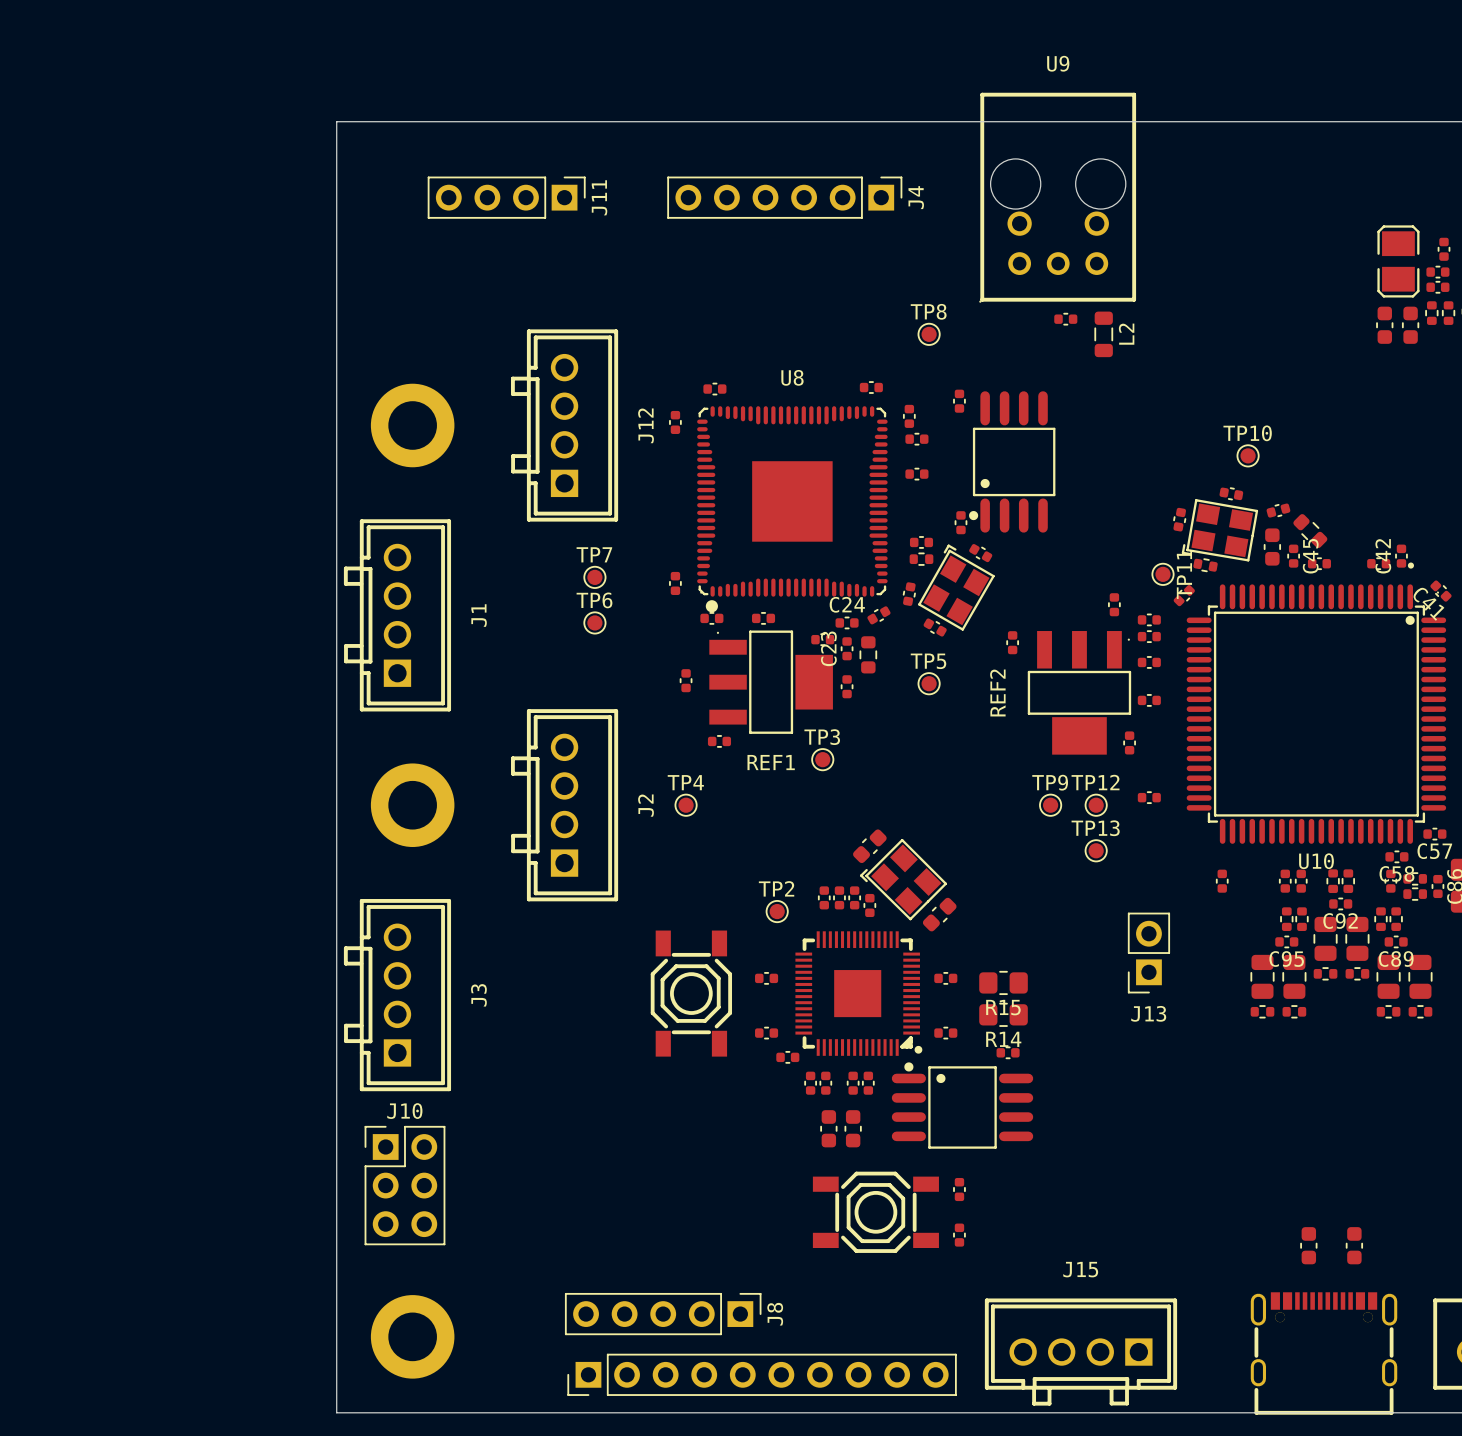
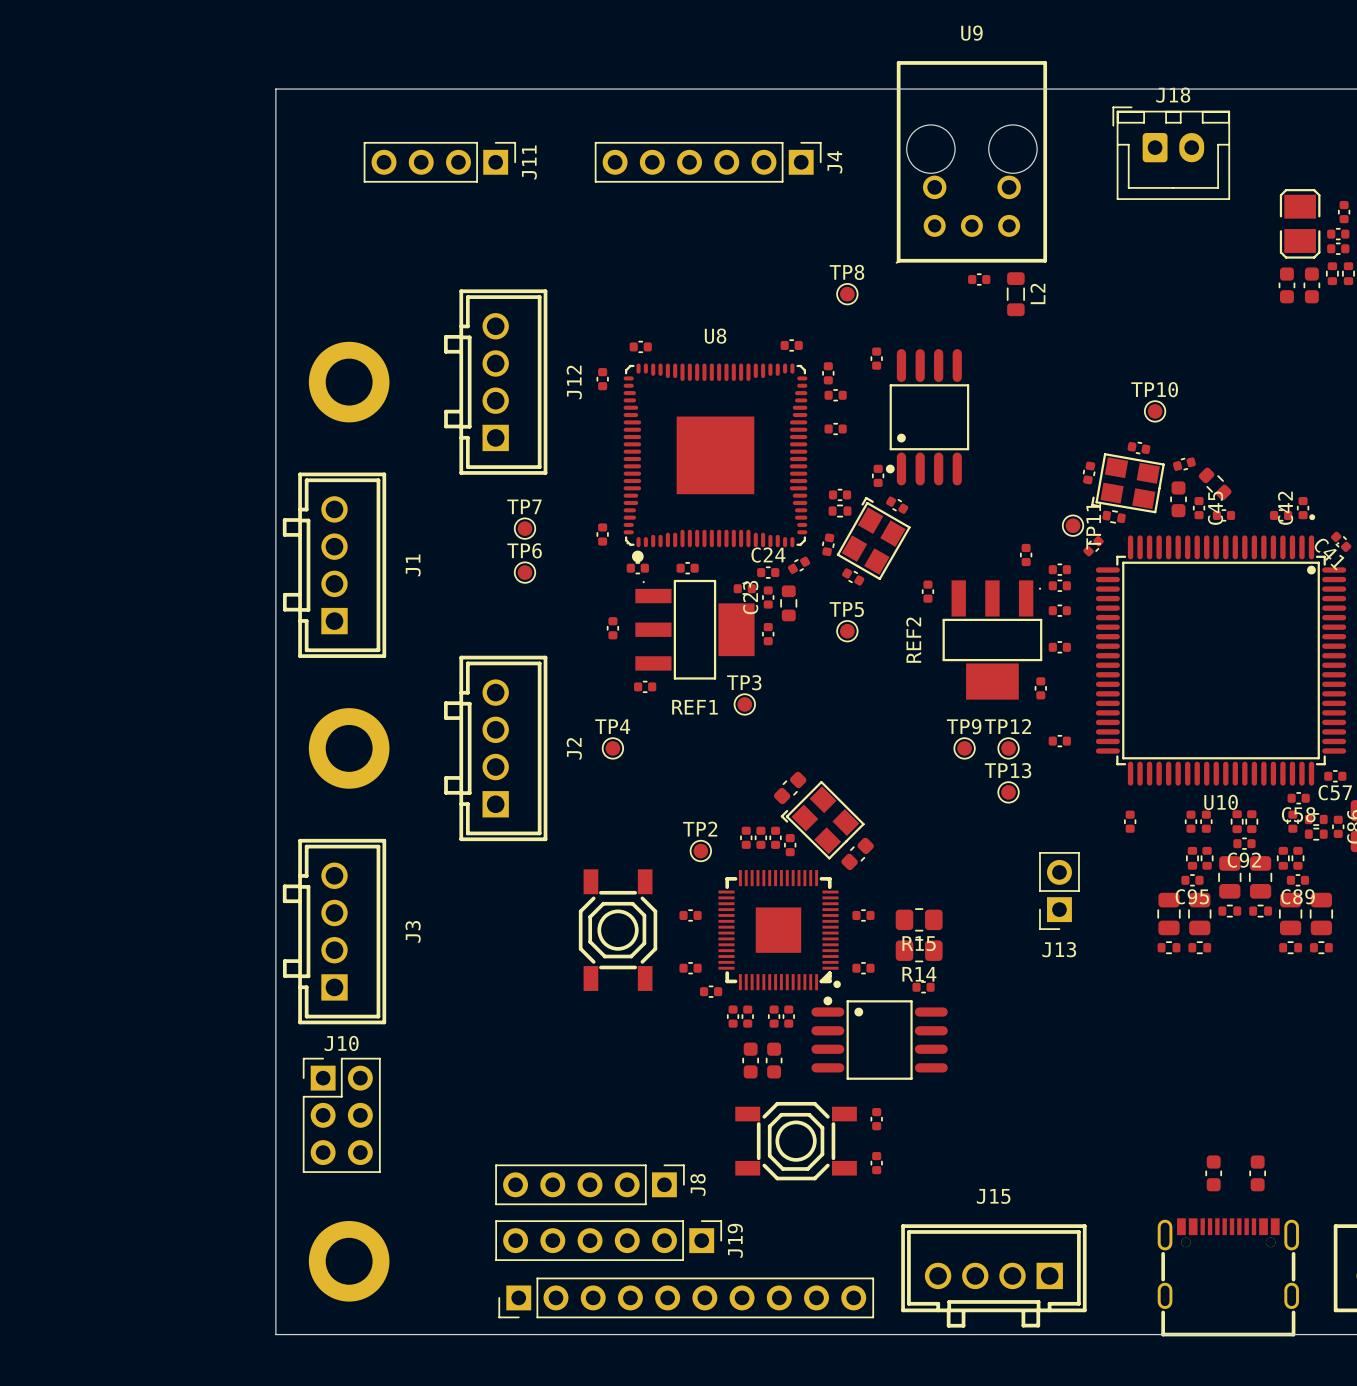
J18: none -> (1171, 153)
J8 position: (663, 1314) -> (589, 1184)
J19: none -> (608, 1240)

